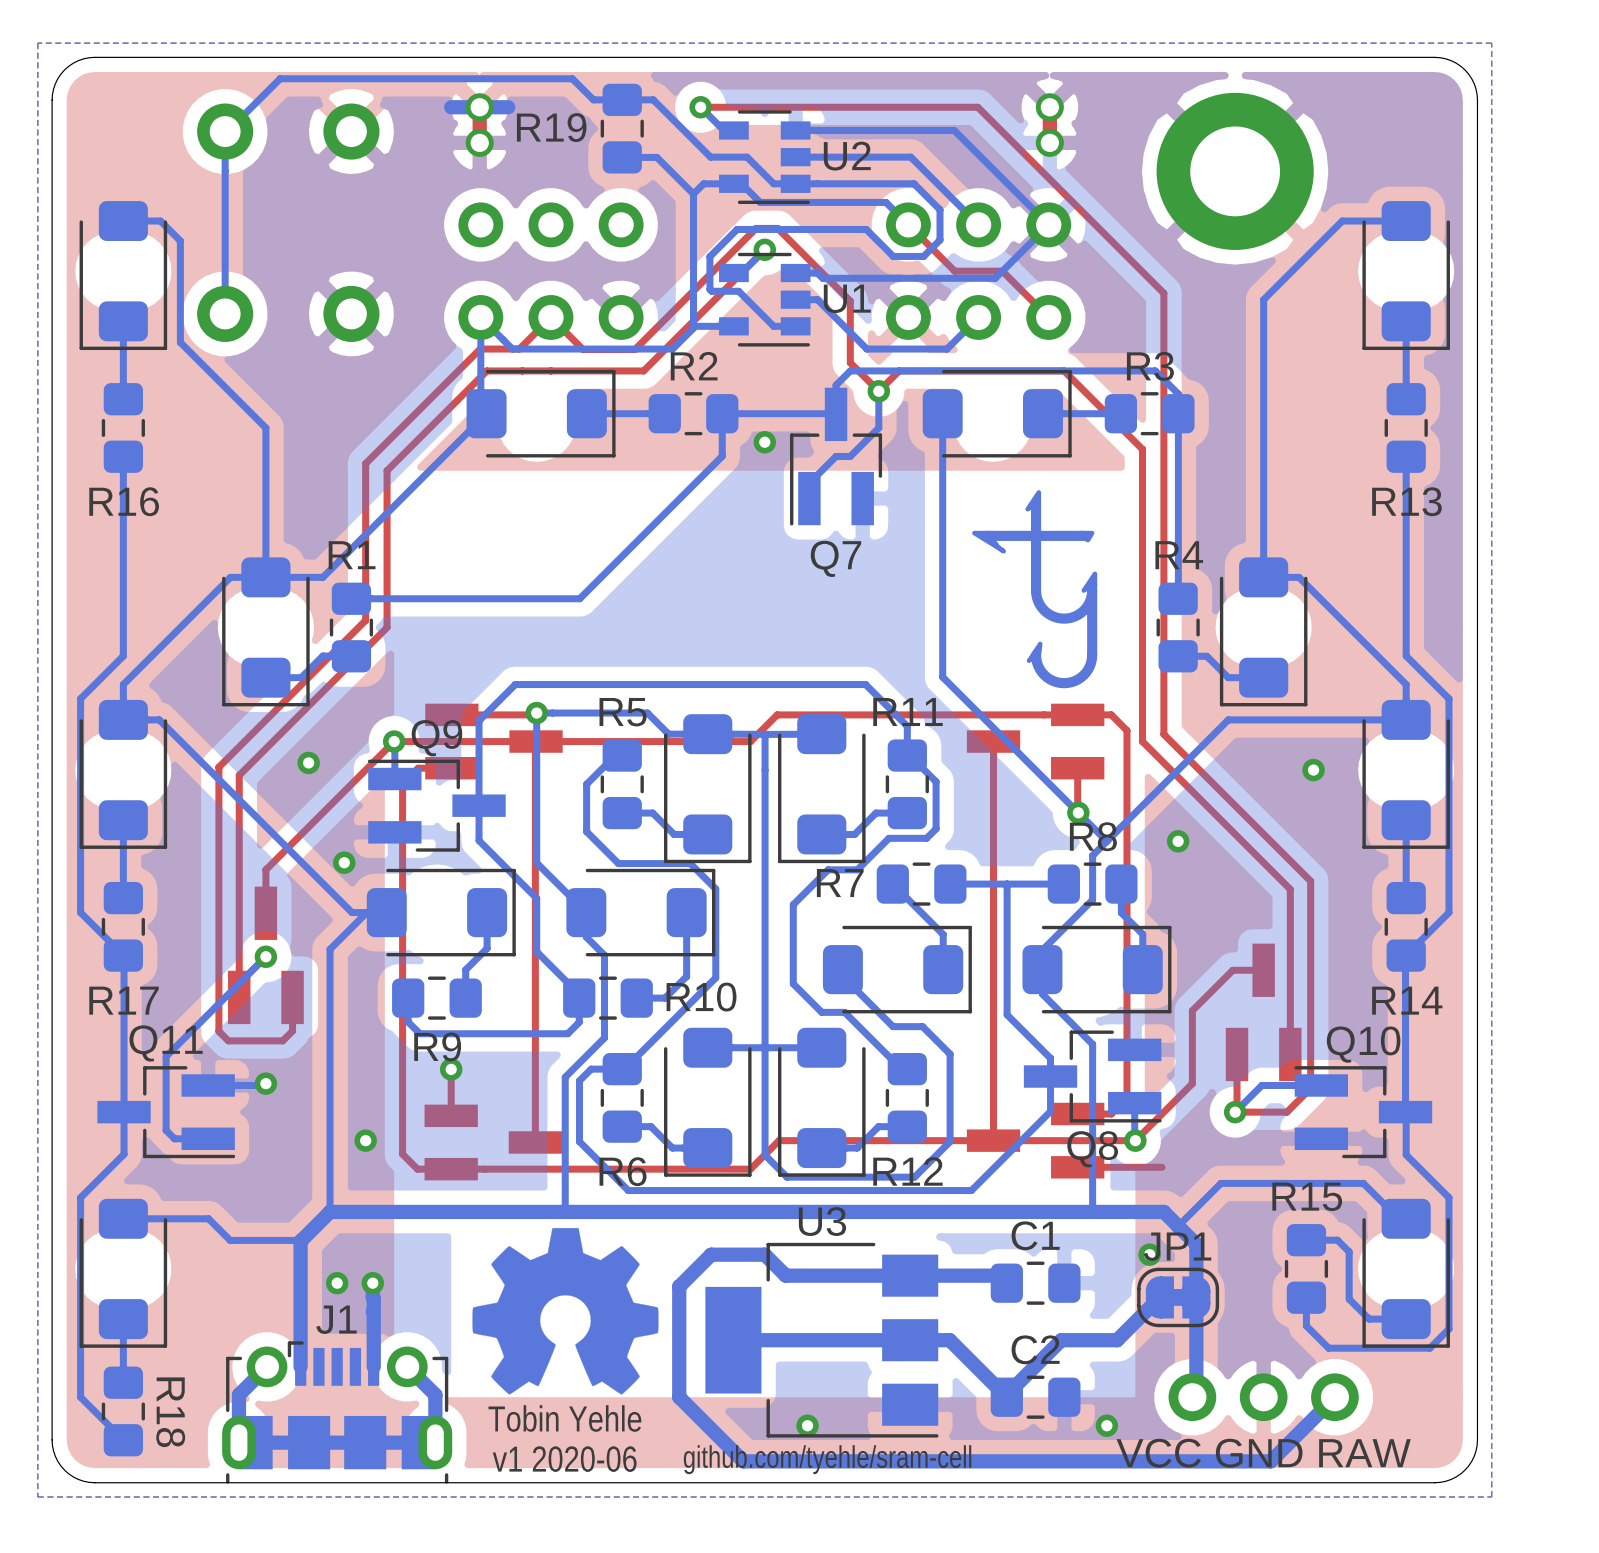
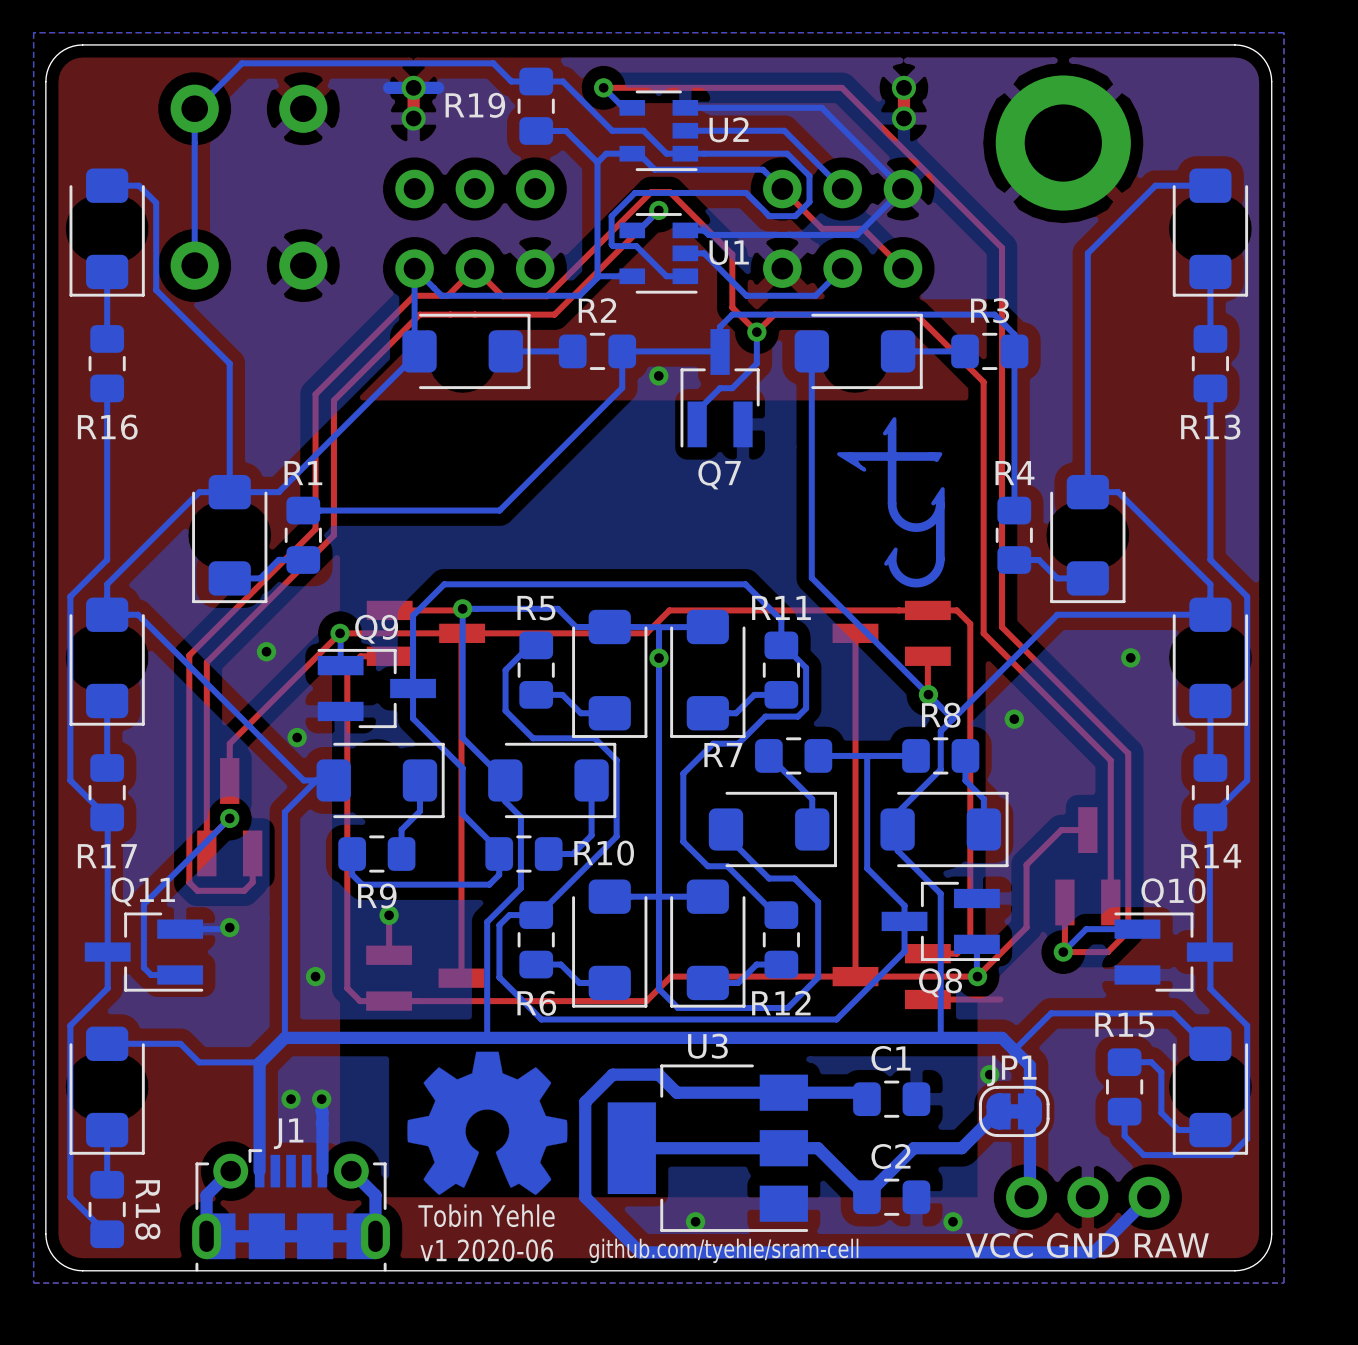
via: none -> (659, 658)

